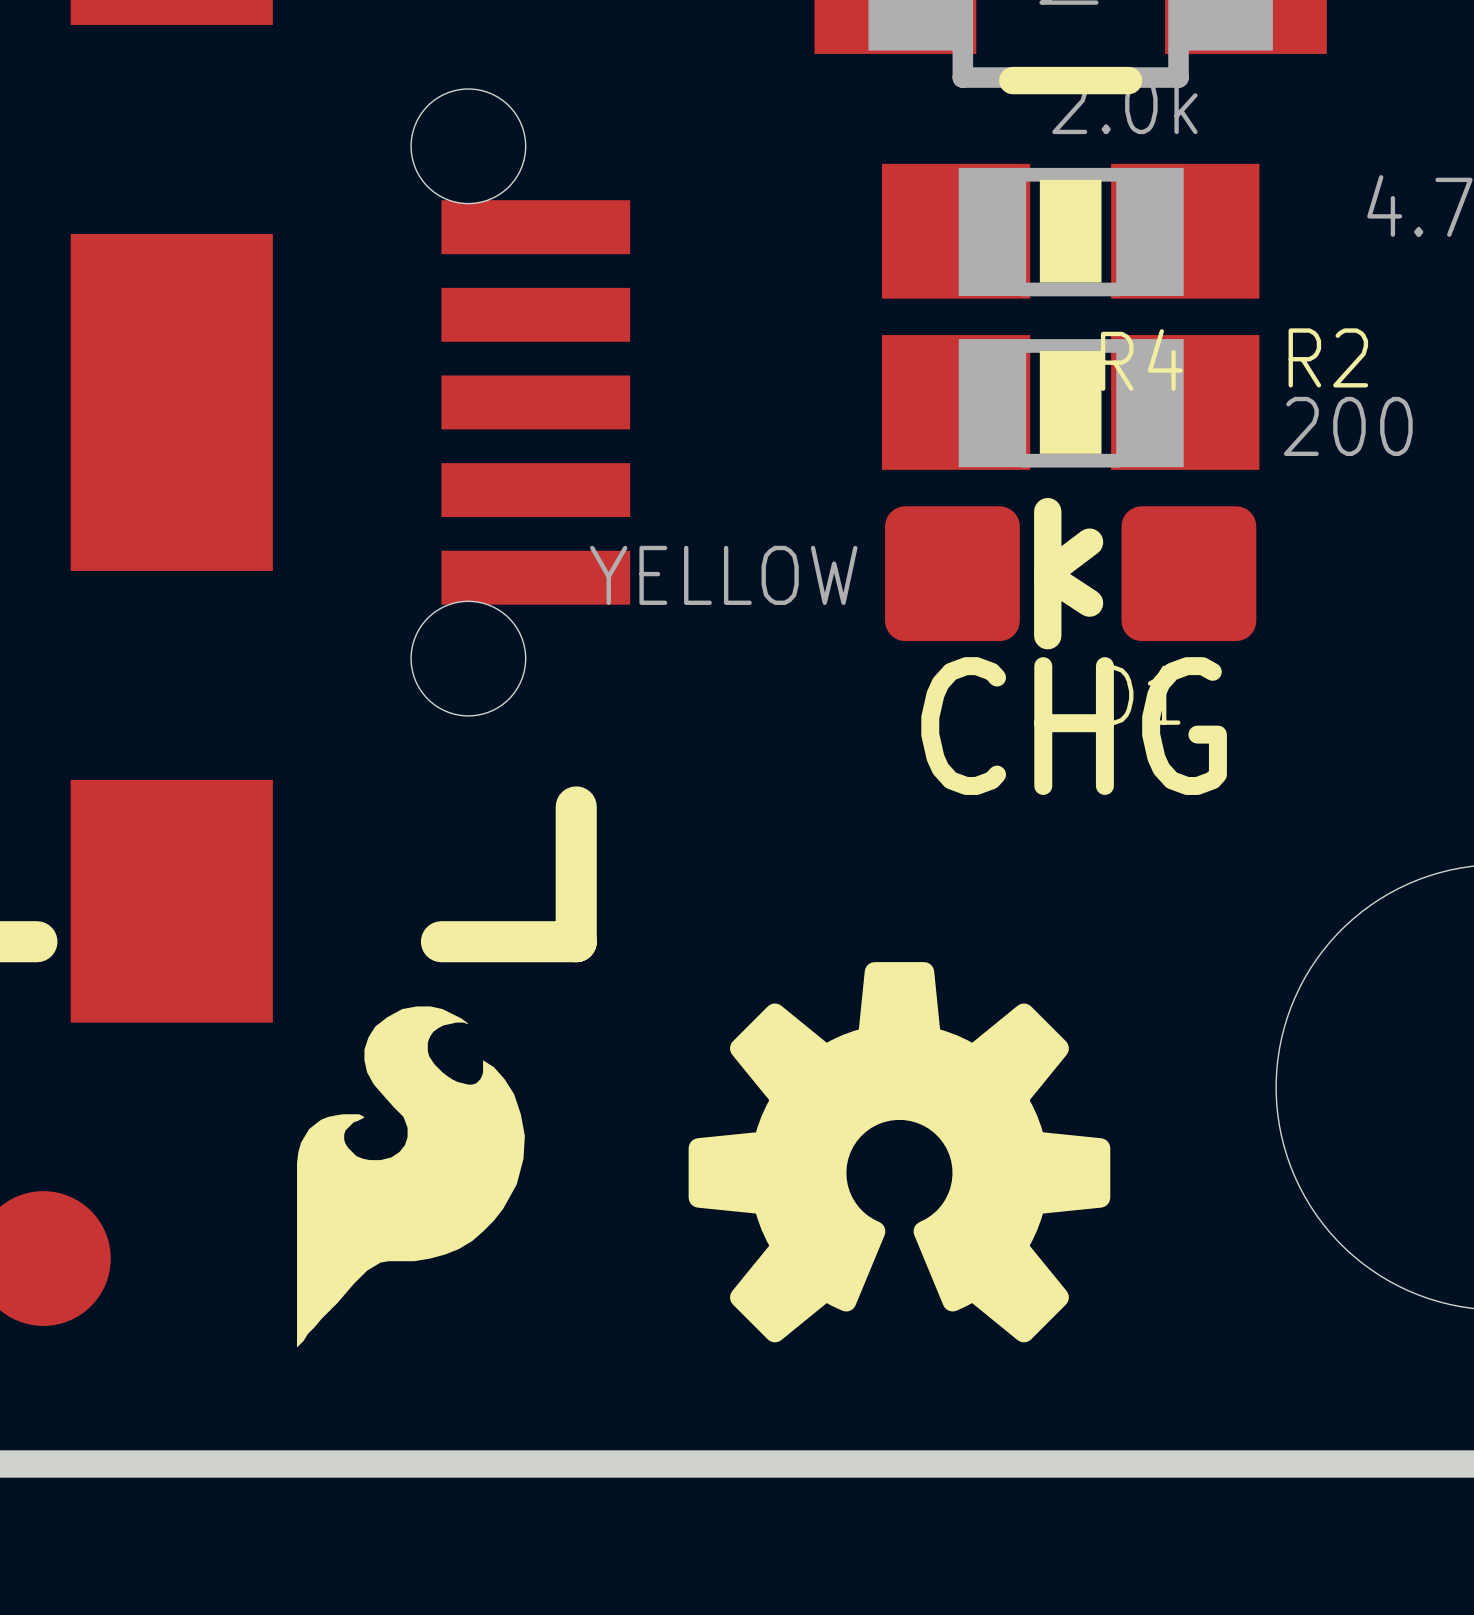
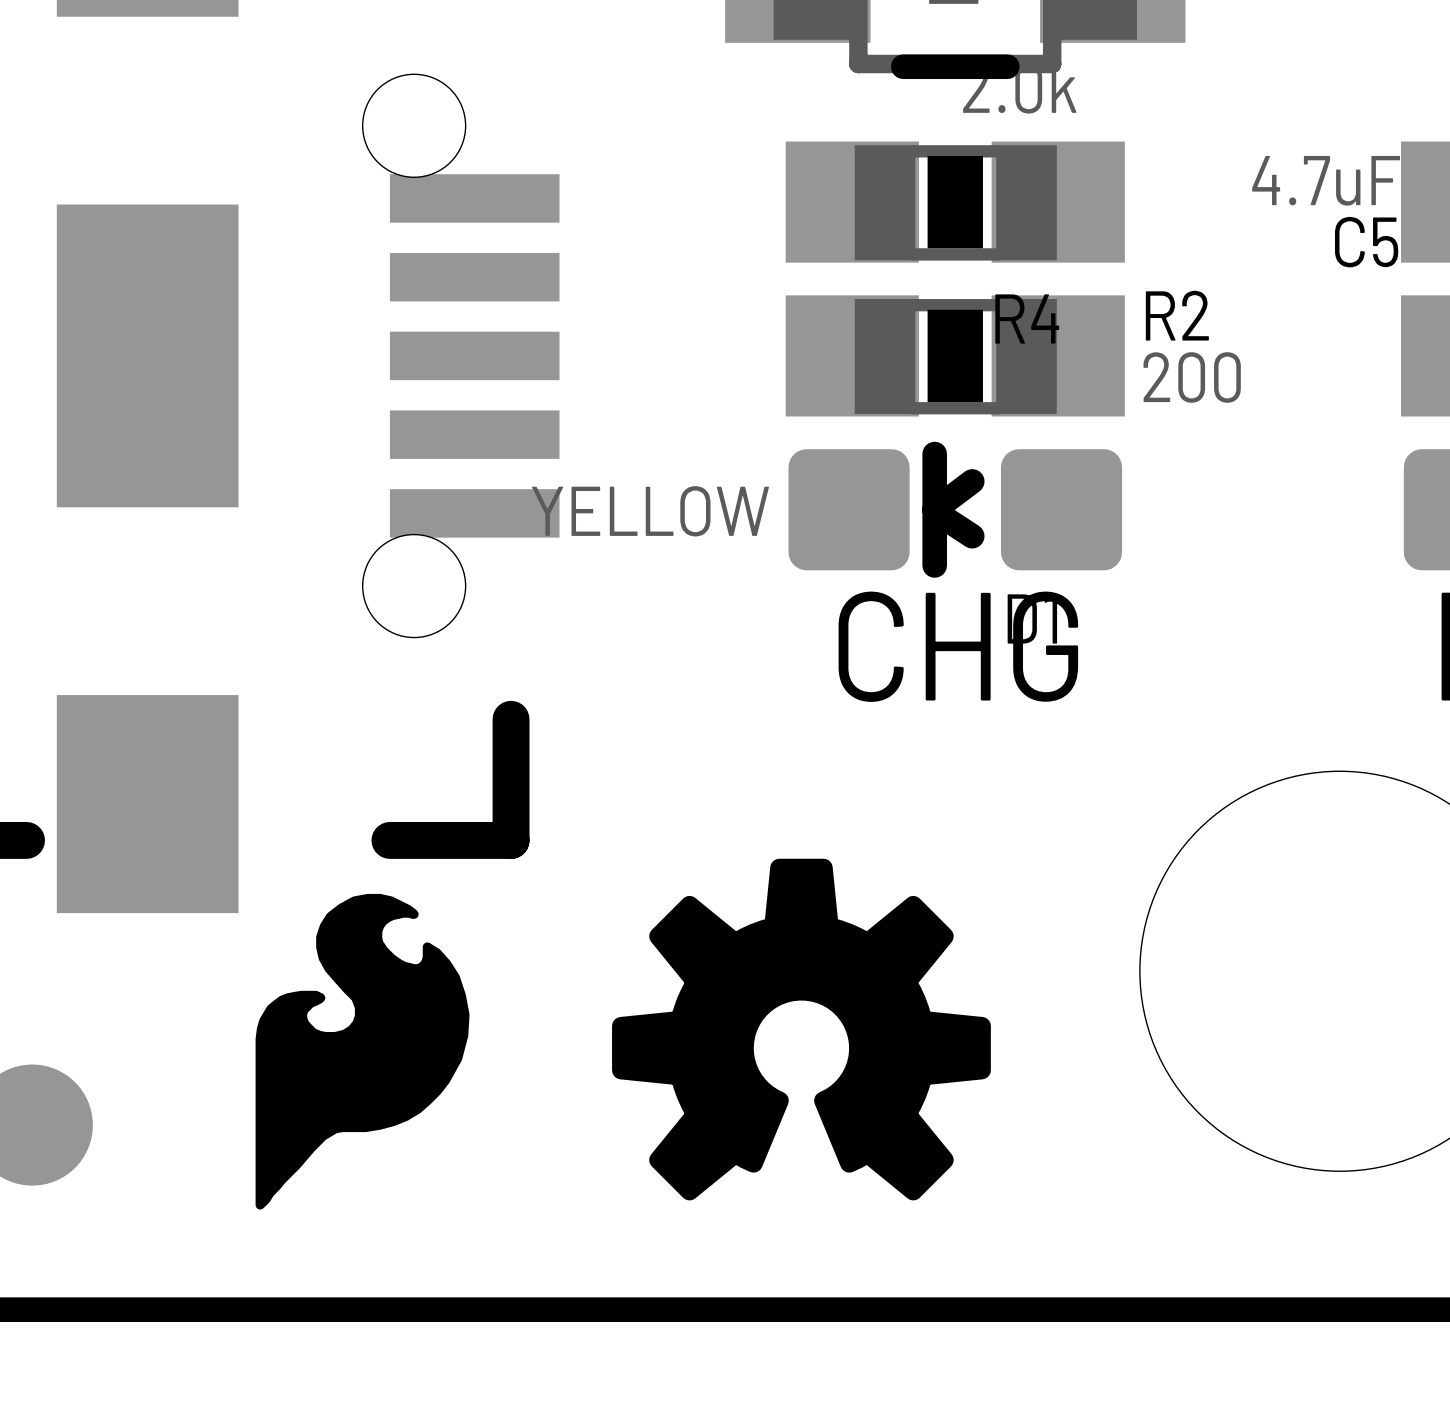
drawing shape: [297, 1006, 525, 1349] -> [255, 893, 470, 1210]

